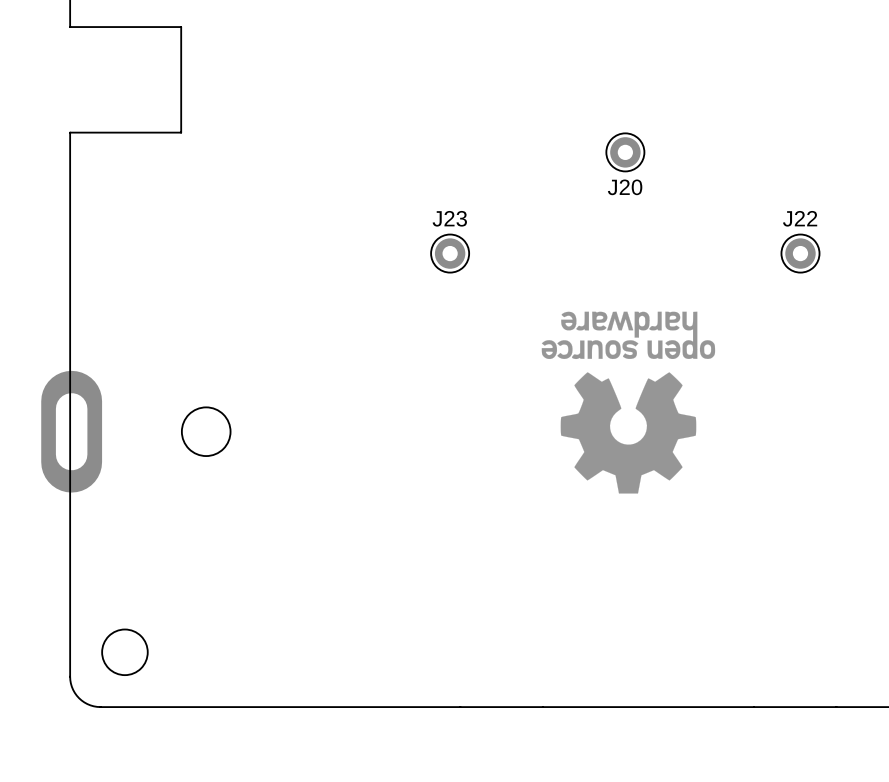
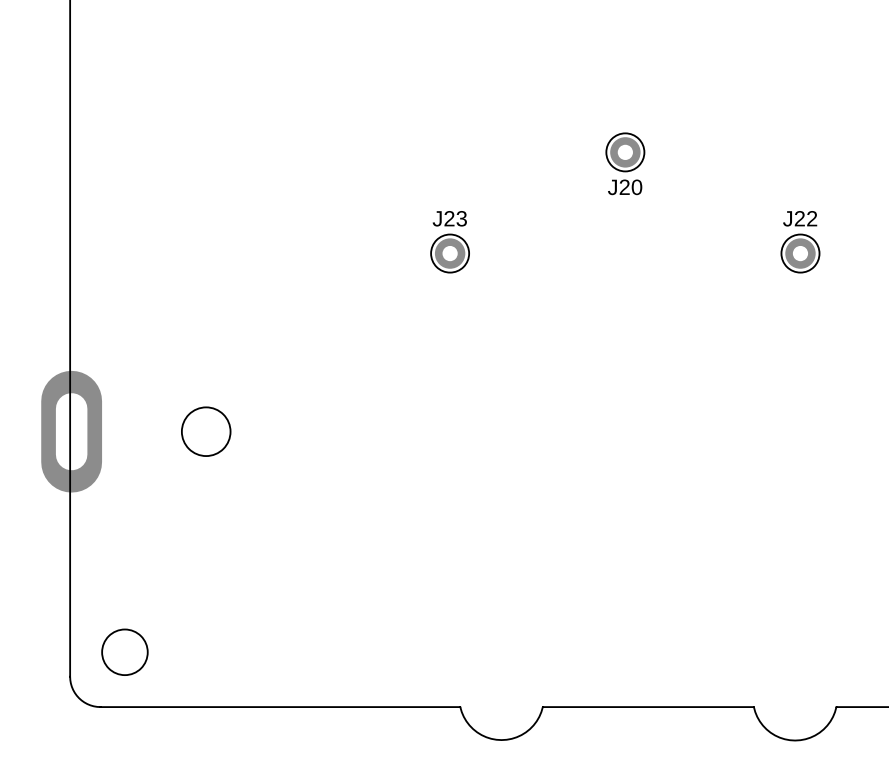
board edge: (70, 27) (181, 27) (181, 132) (70, 132) -> (70, 27) (70, 132)
part: (628, 402) -> none
board edge: (542, 707) (460, 707) -> (542, 707) (539, 716) (529, 729) (516, 737) (501, 740) (486, 737) (477, 732) (466, 721) (460, 707)
board edge: (836, 707) (753, 707) -> (836, 707) (830, 721) (819, 732) (805, 739) (795, 740) (779, 737) (770, 732) (759, 721) (753, 707)

